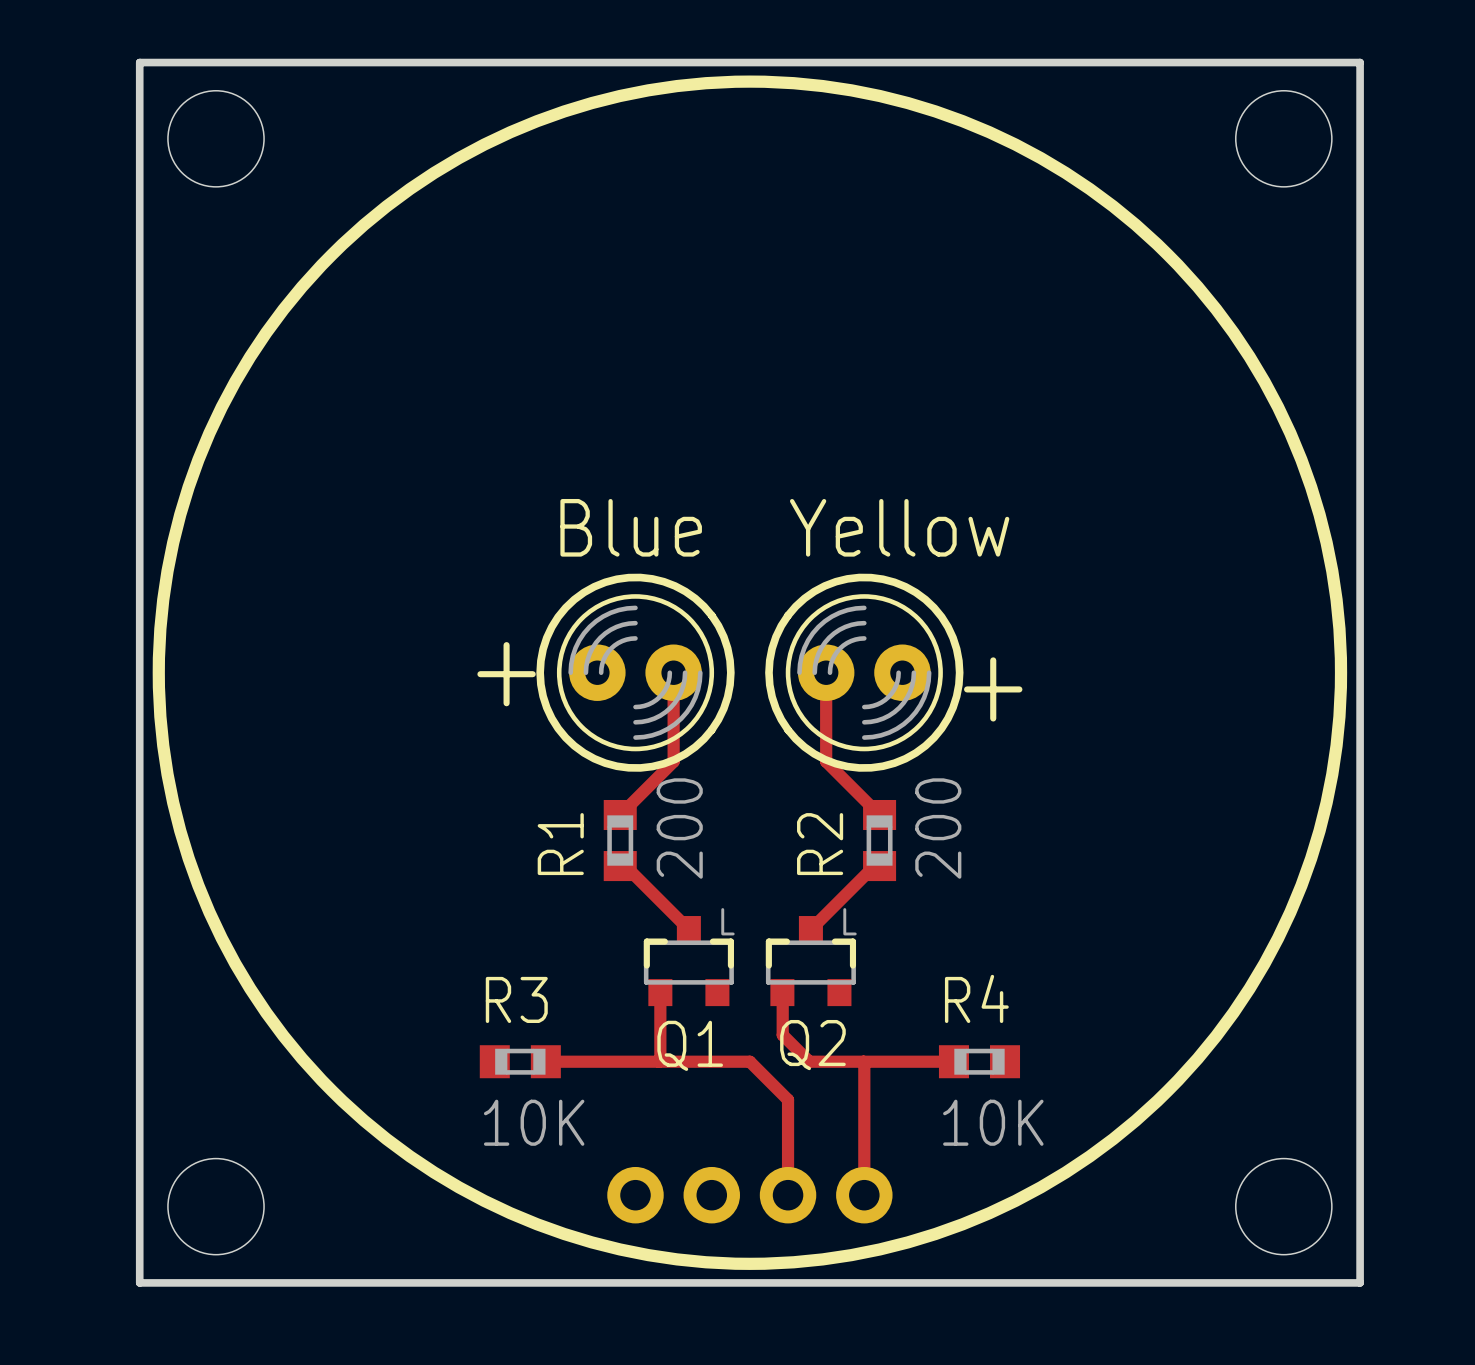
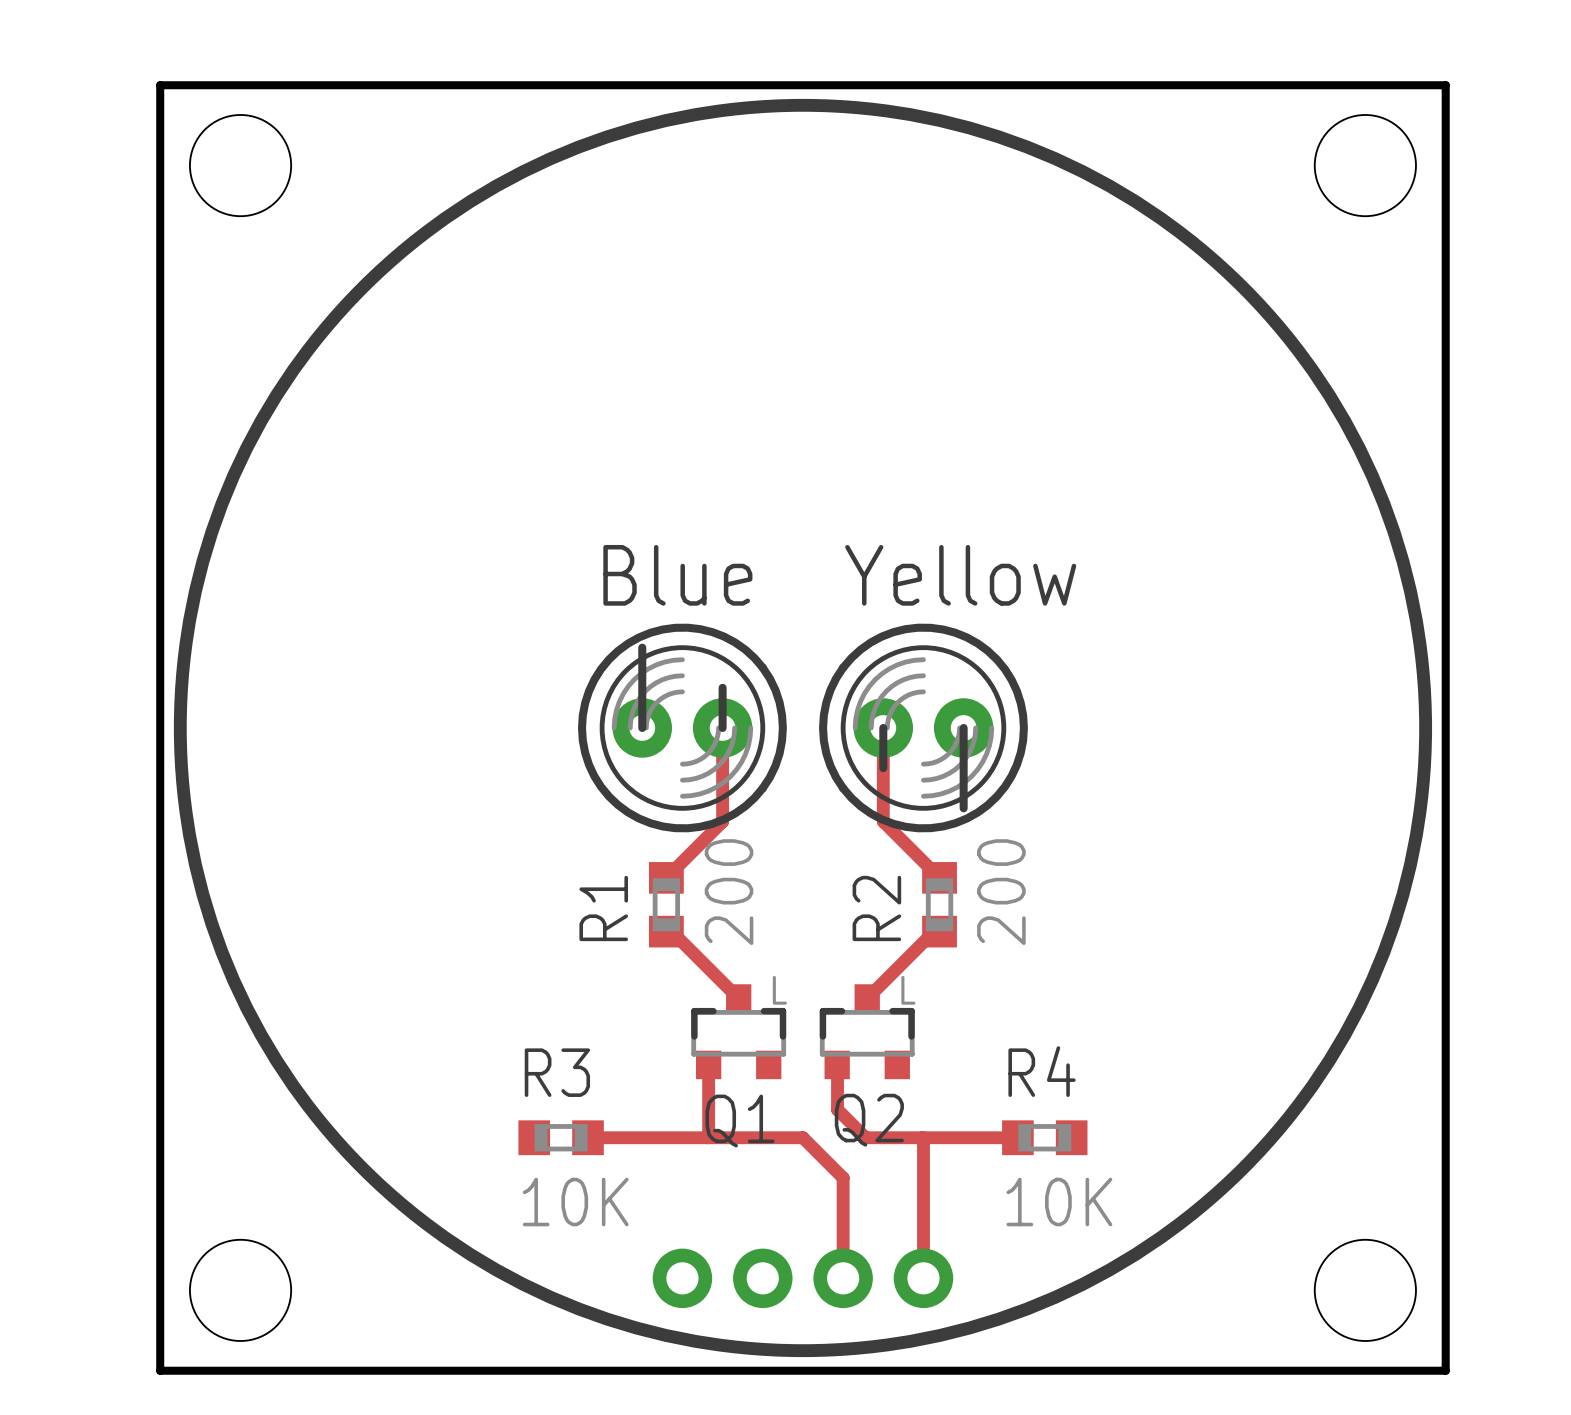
part footprint: [536, 573, 735, 772] -> [578, 623, 787, 833]
part footprint: [765, 573, 964, 772] -> [819, 623, 1028, 833]

